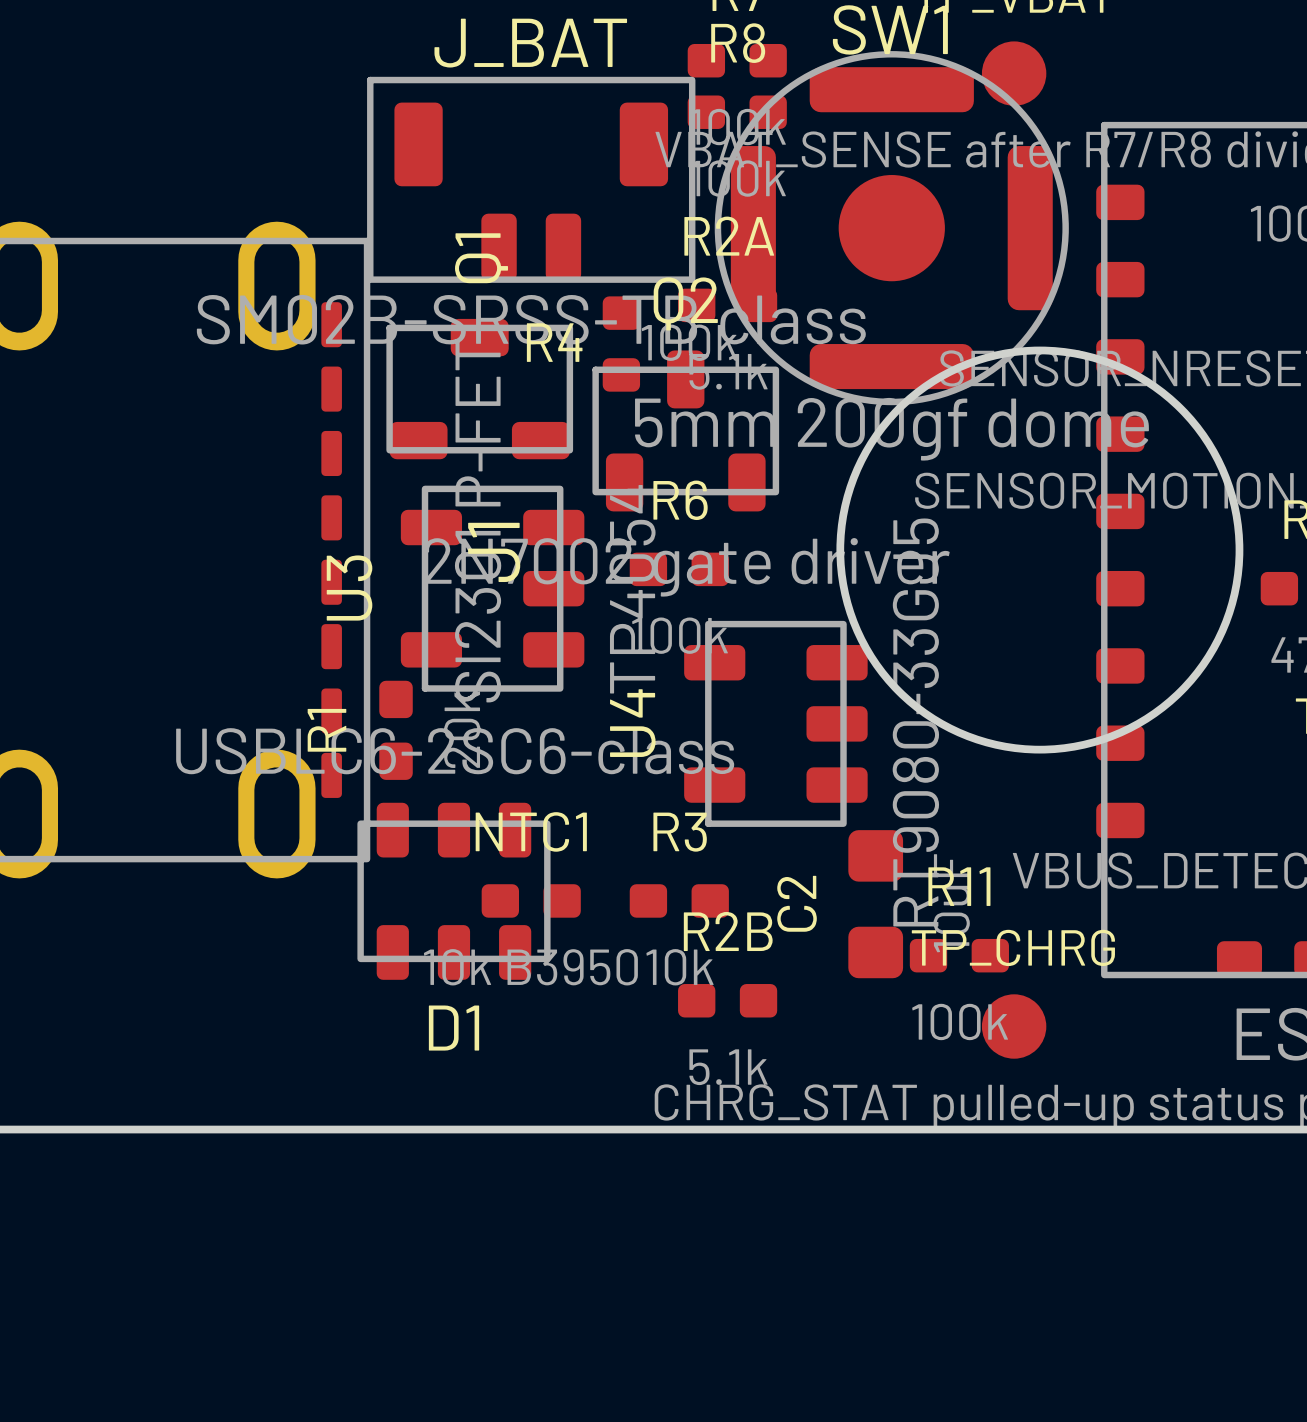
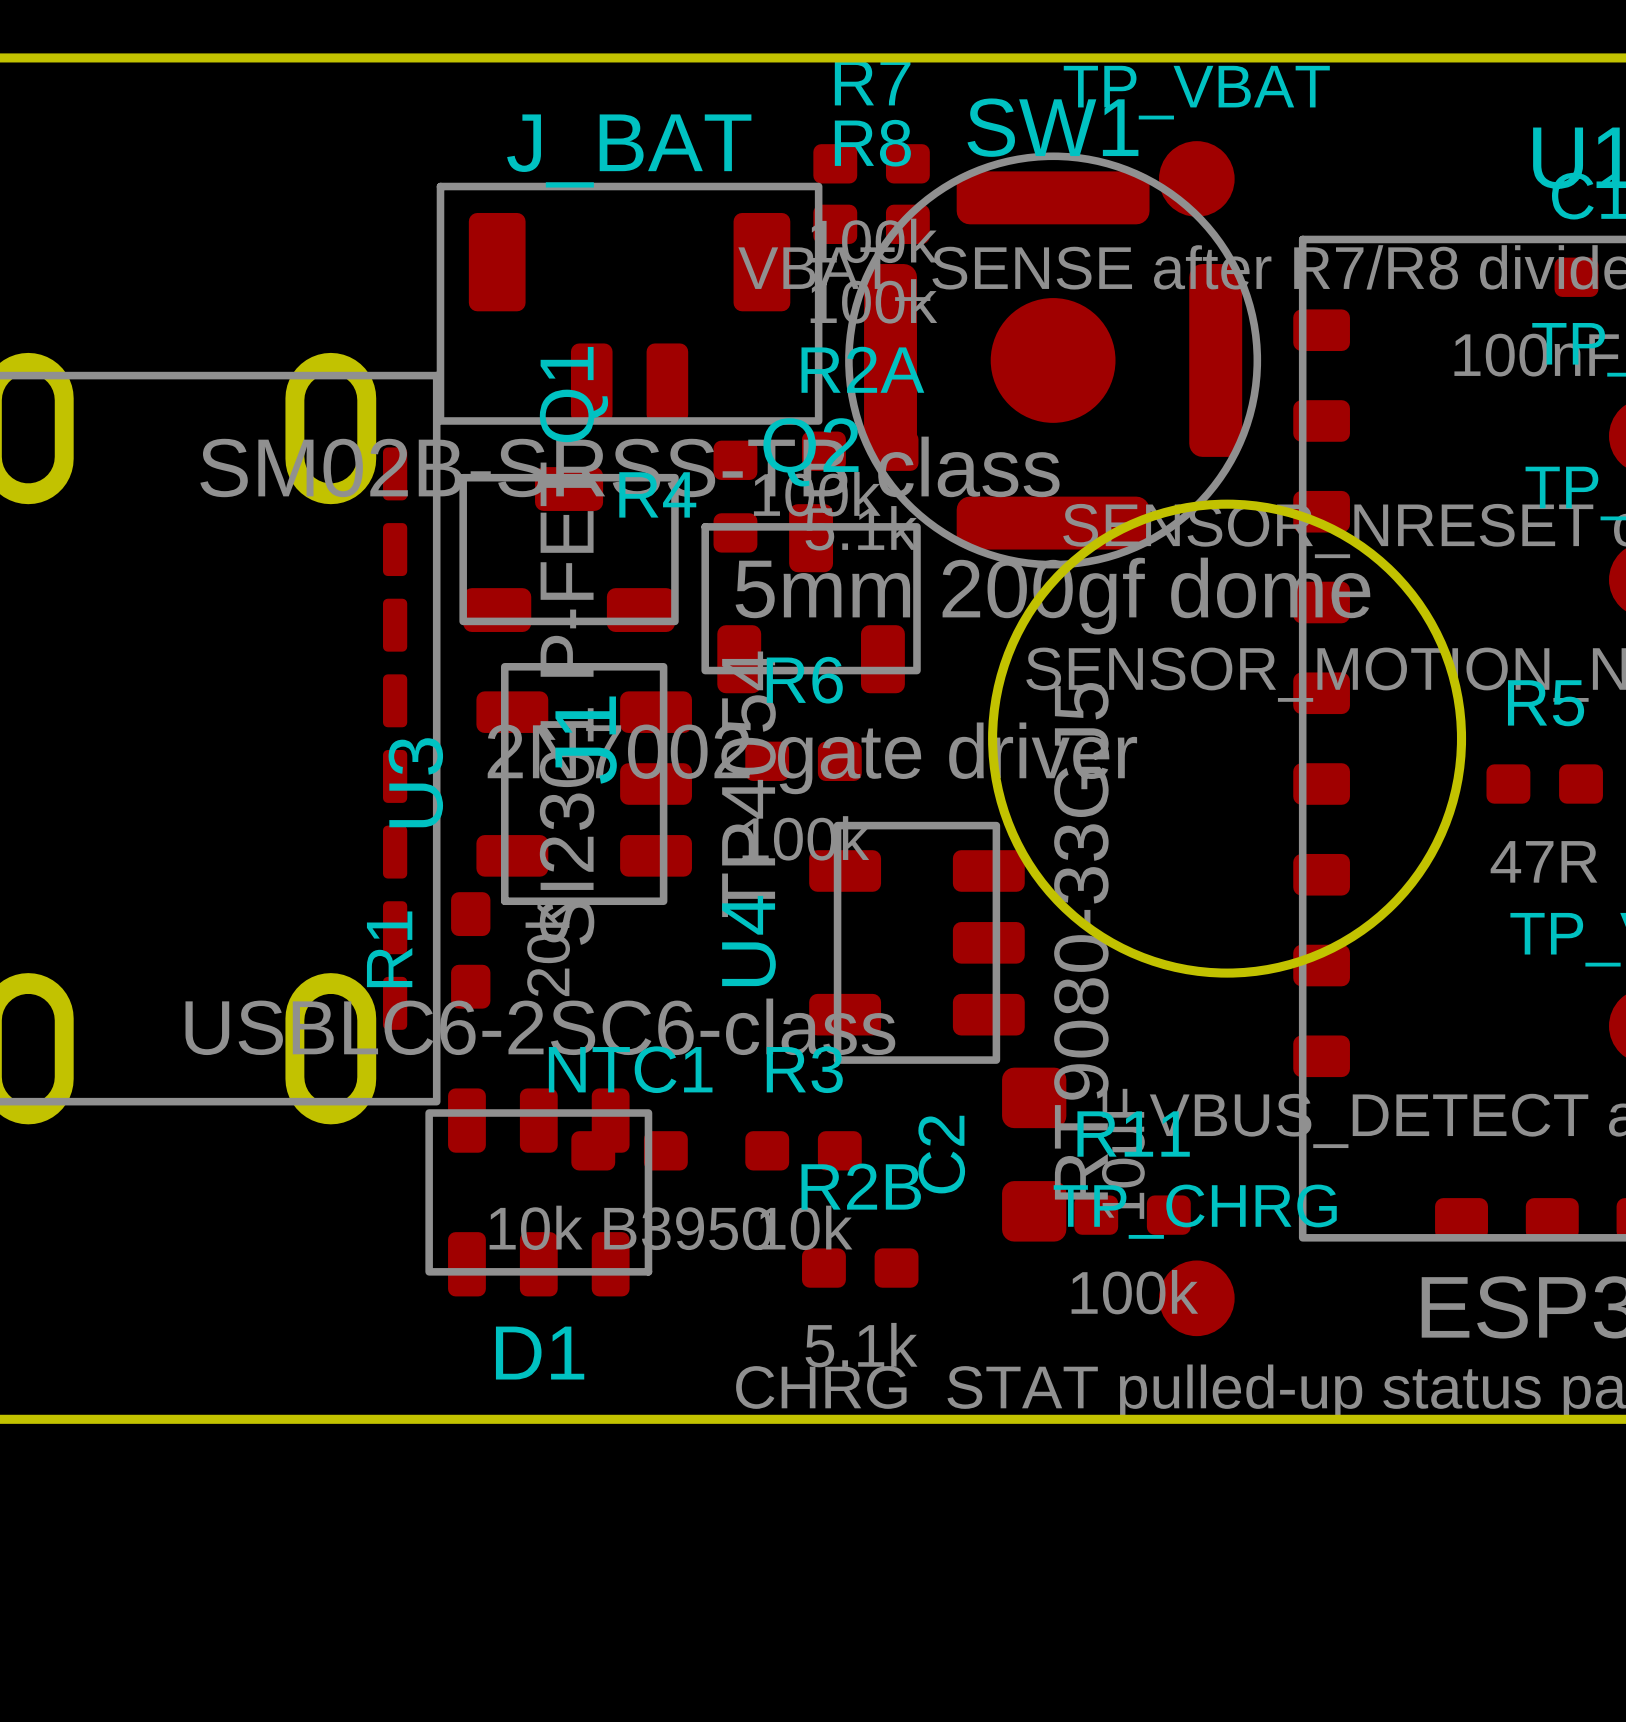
D1 position: (453, 891) -> (538, 1192)

